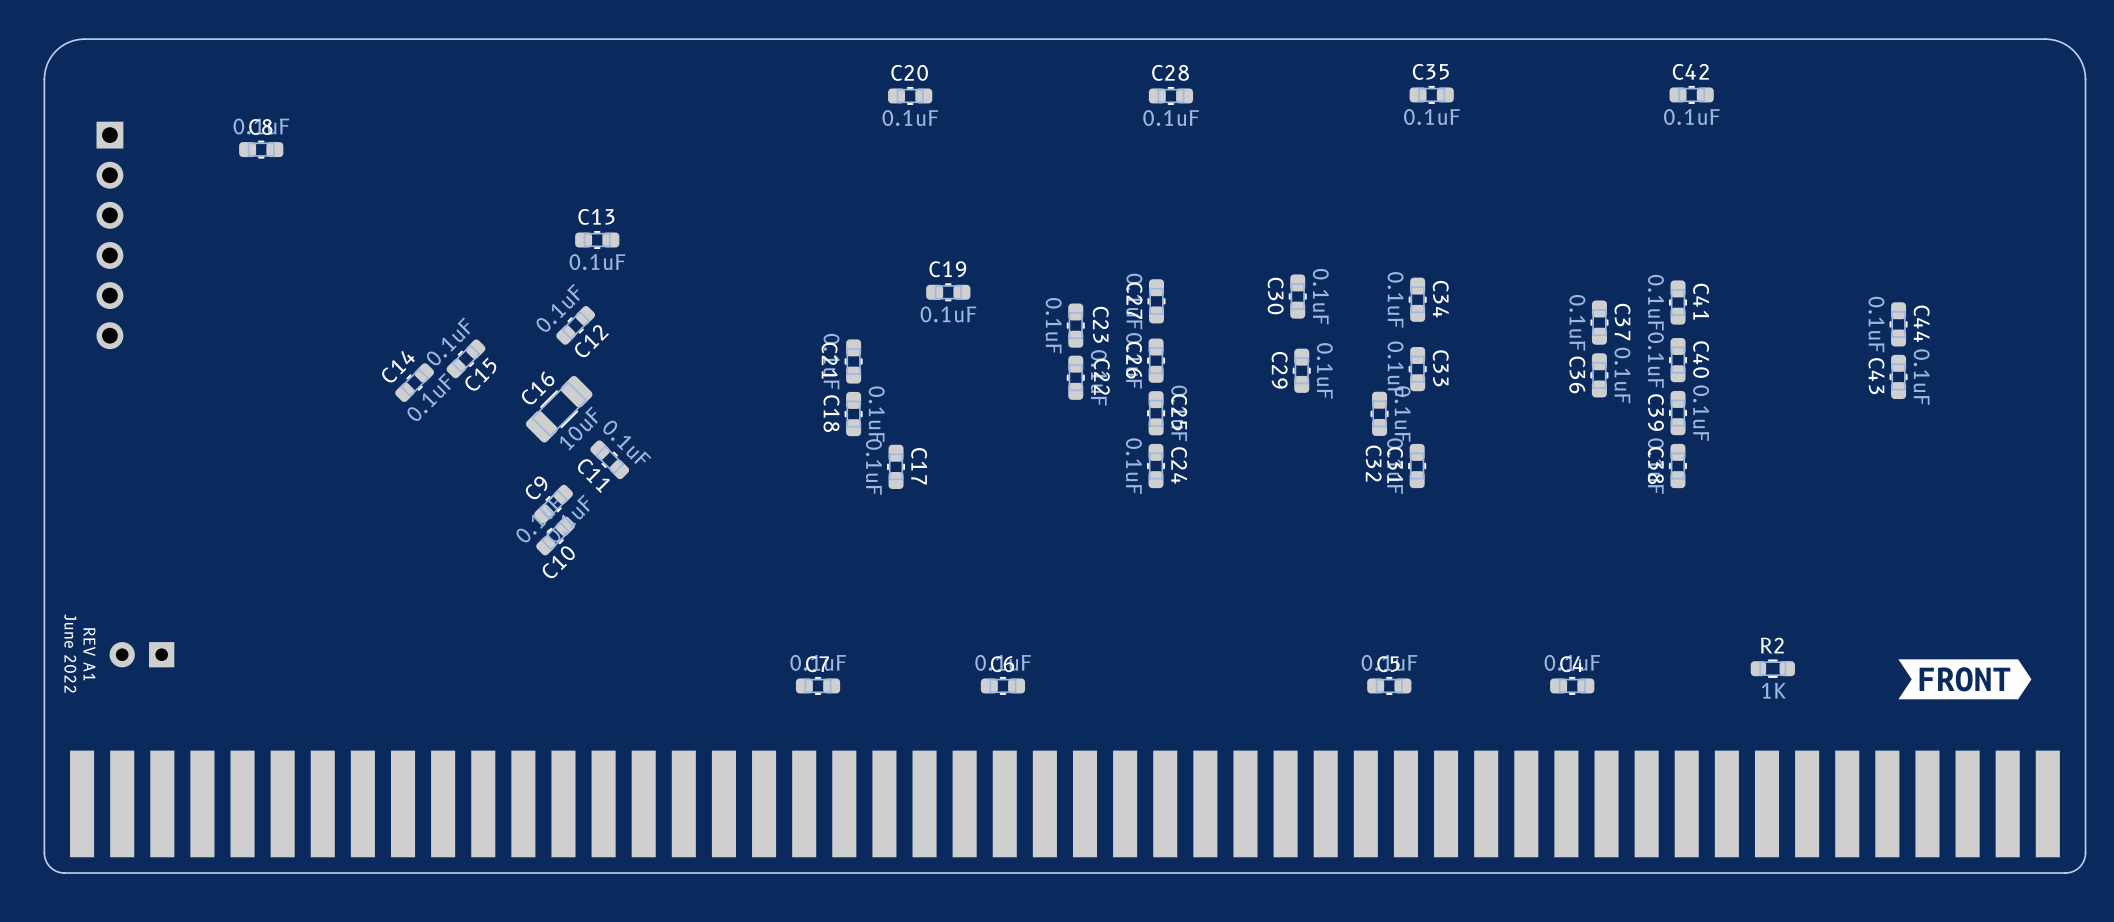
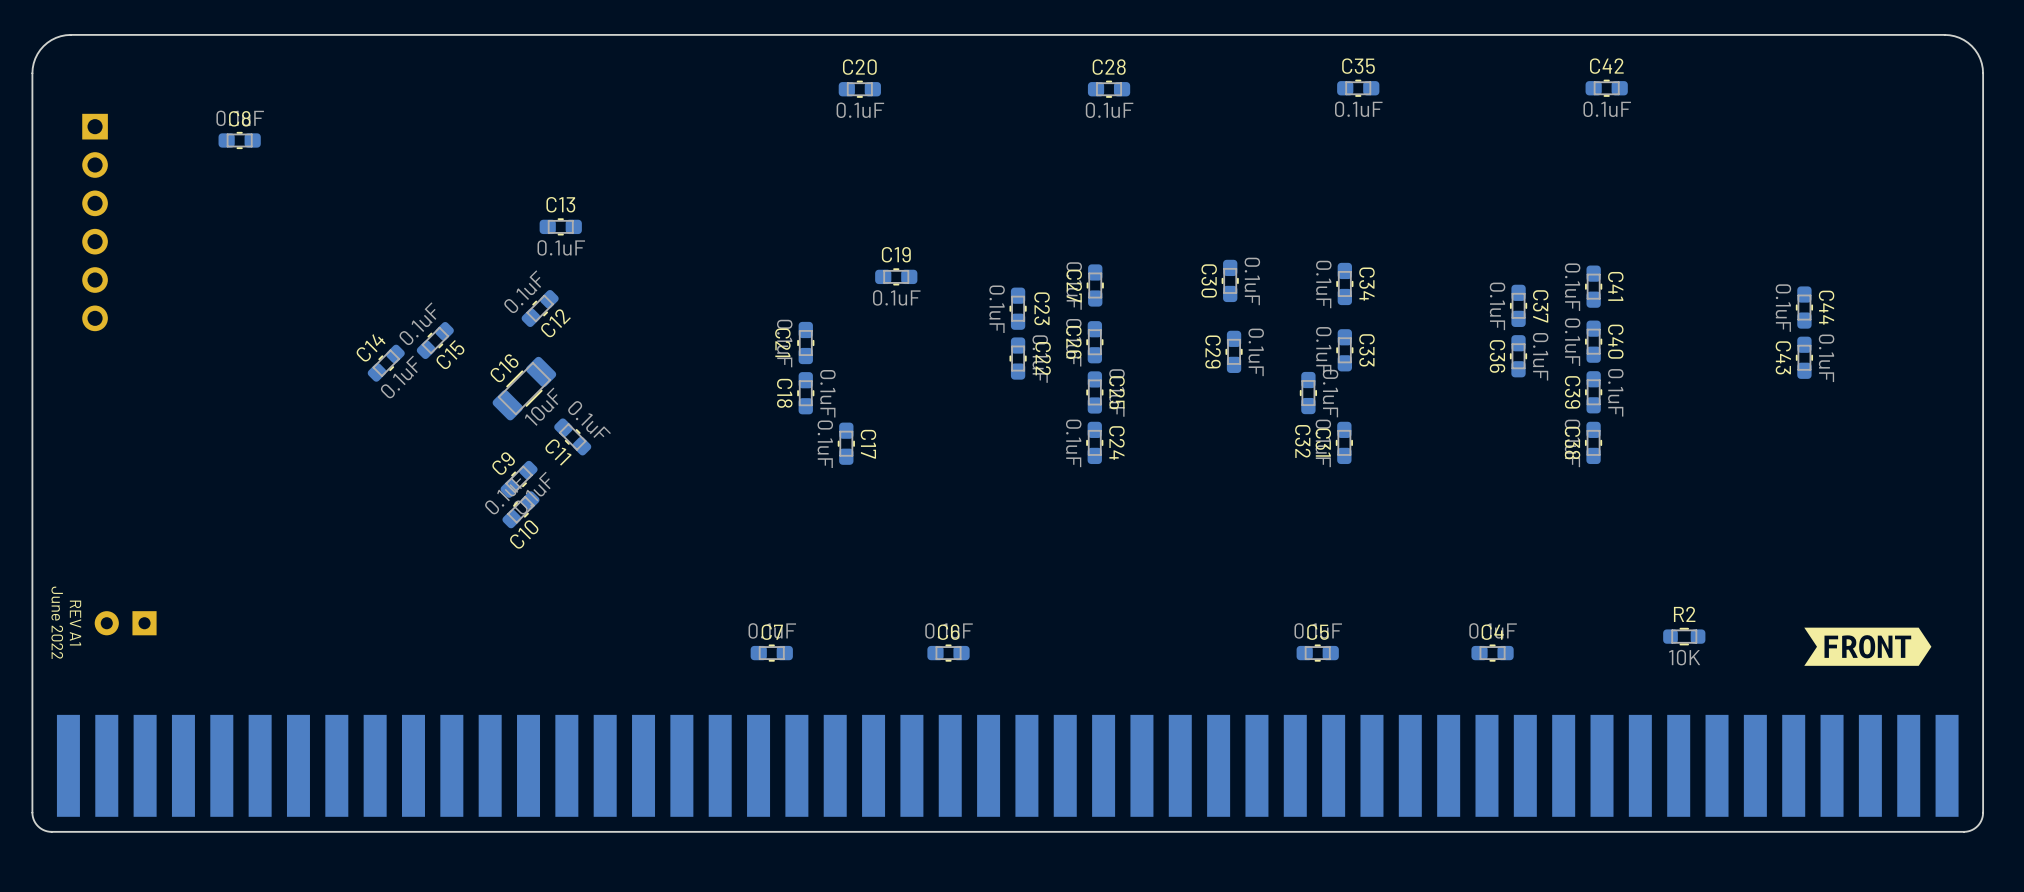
R2 value: 1K (1773, 690) -> 10K (1684, 657)

